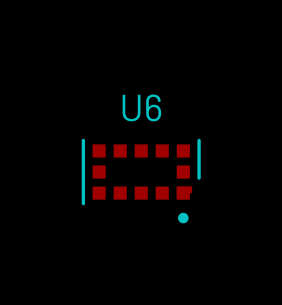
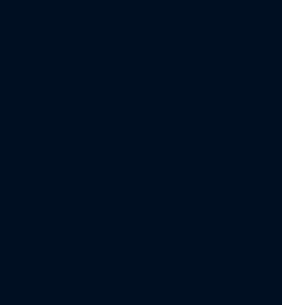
U6: (141, 181) -> none

